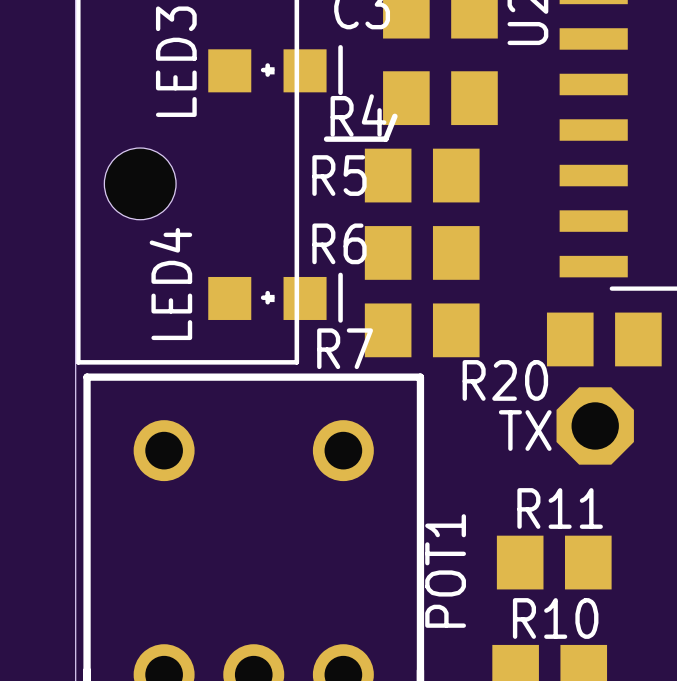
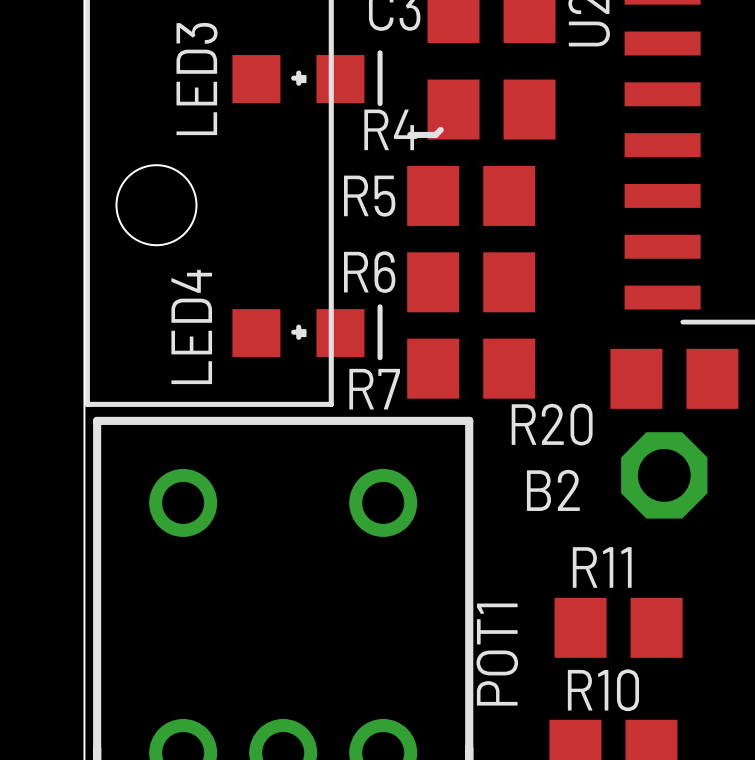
line: (394, 116) (385, 139) (326, 139) -> (440, 129) (435, 134) (410, 134)
TX name: TX (525, 430) -> B2 (553, 490)

